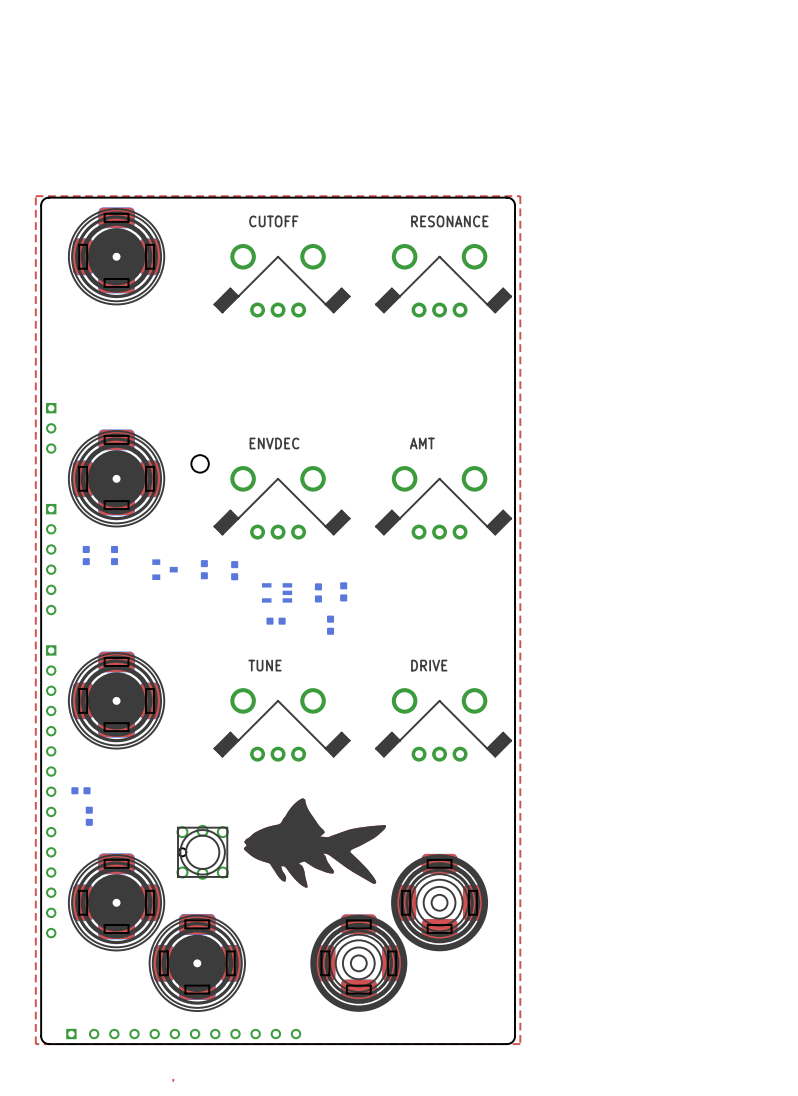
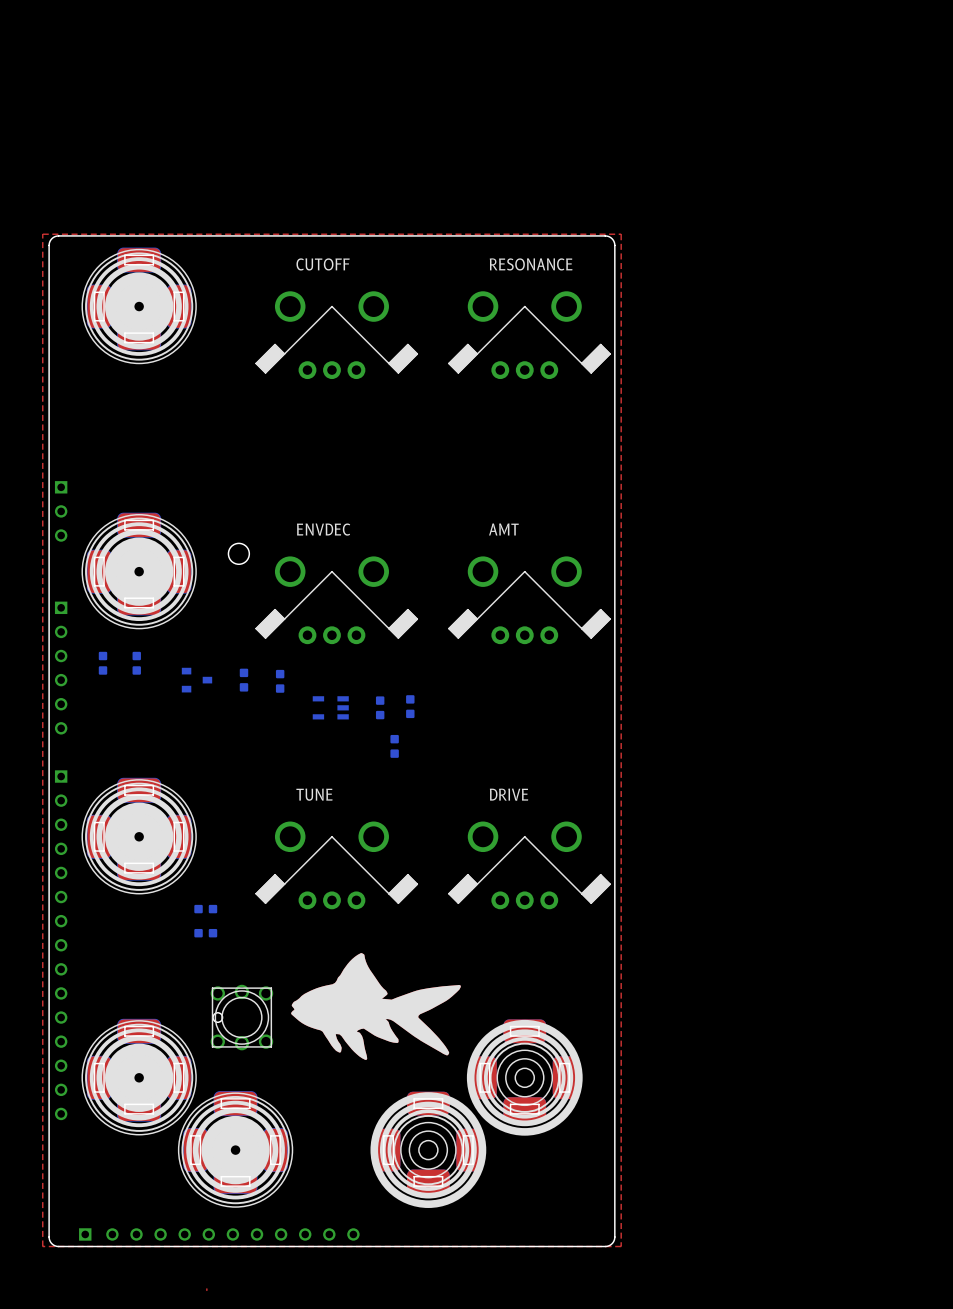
part: (276, 621) -> none
part: none -> (205, 909)
part: none -> (205, 933)
part: (80, 790) -> none
part: (89, 816) -> none

